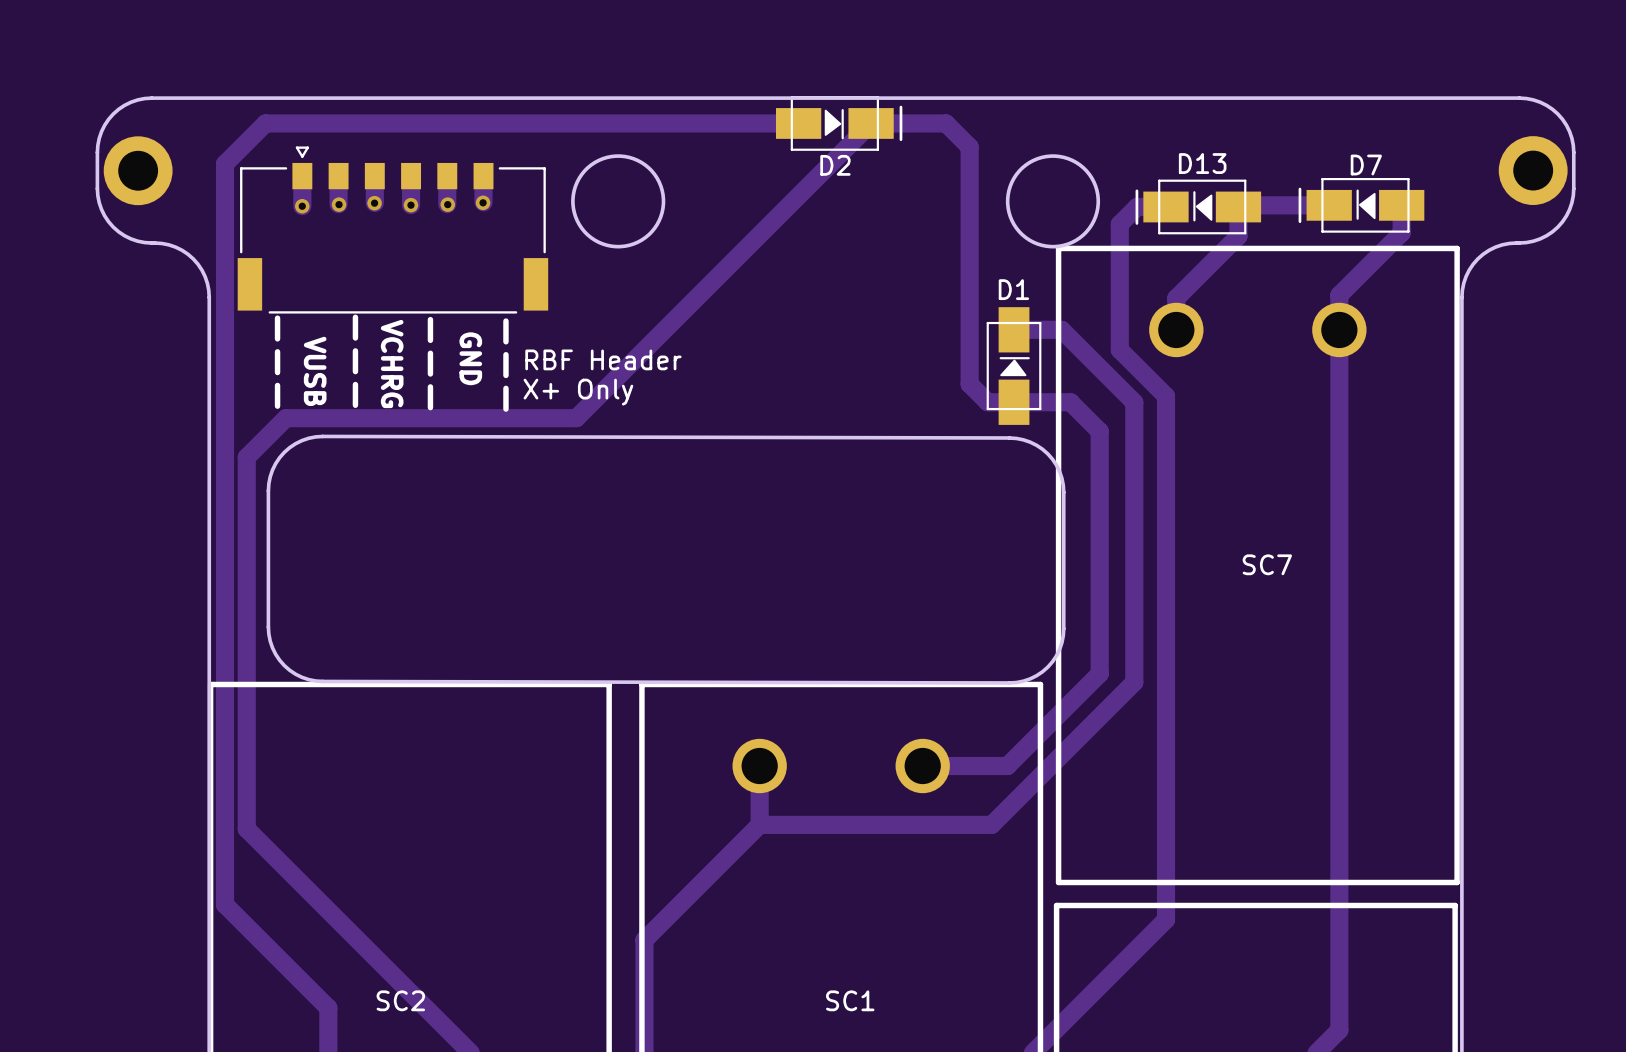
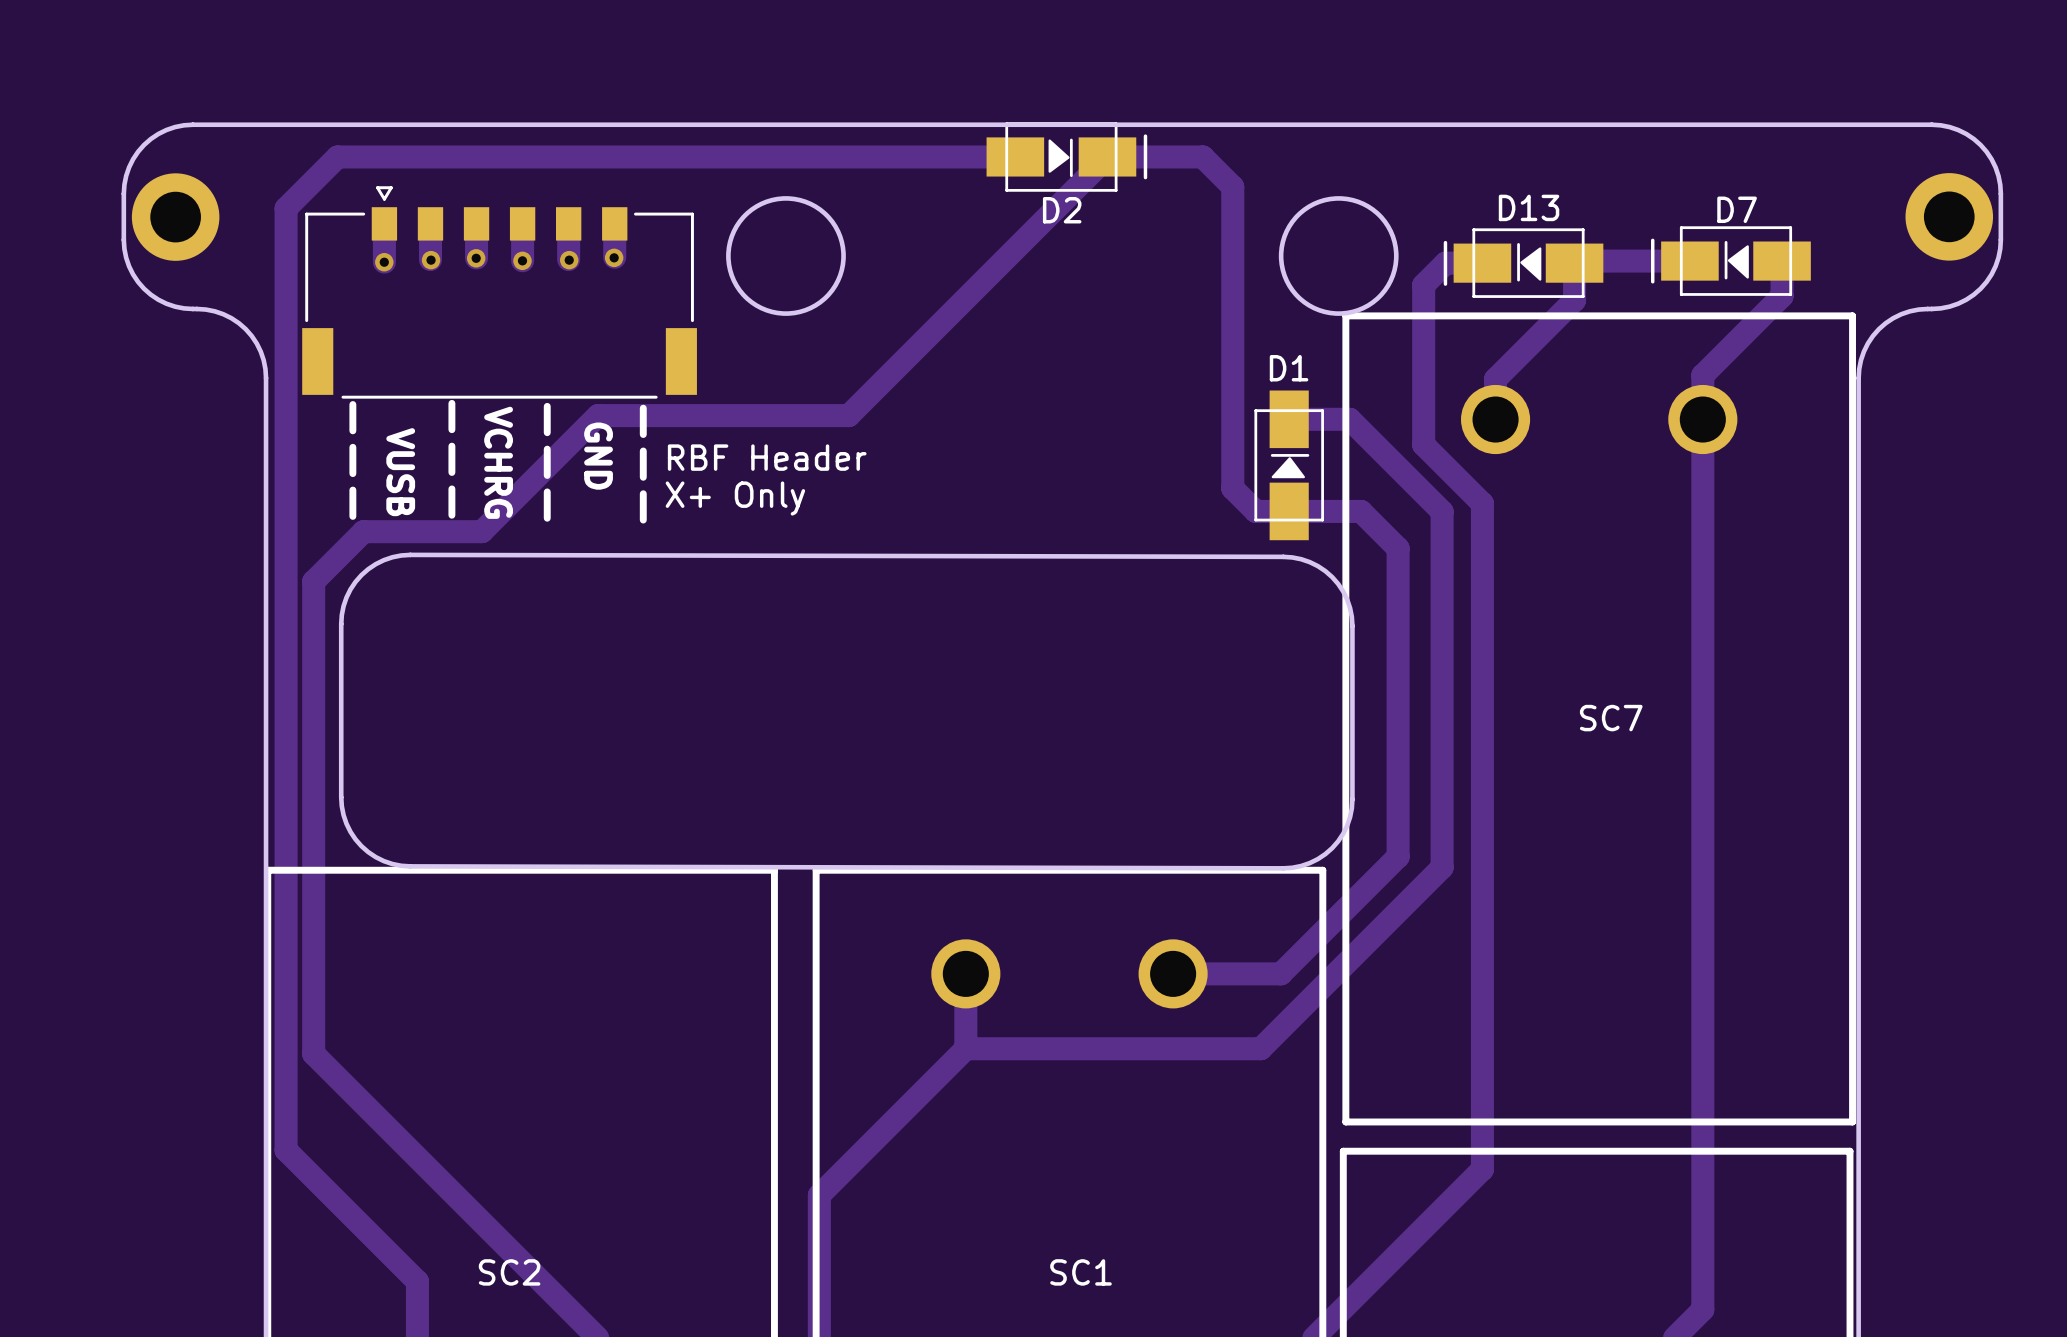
track: (667, 326) (576, 418) (379, 418) -> (848, 415) (598, 415) (481, 531)

